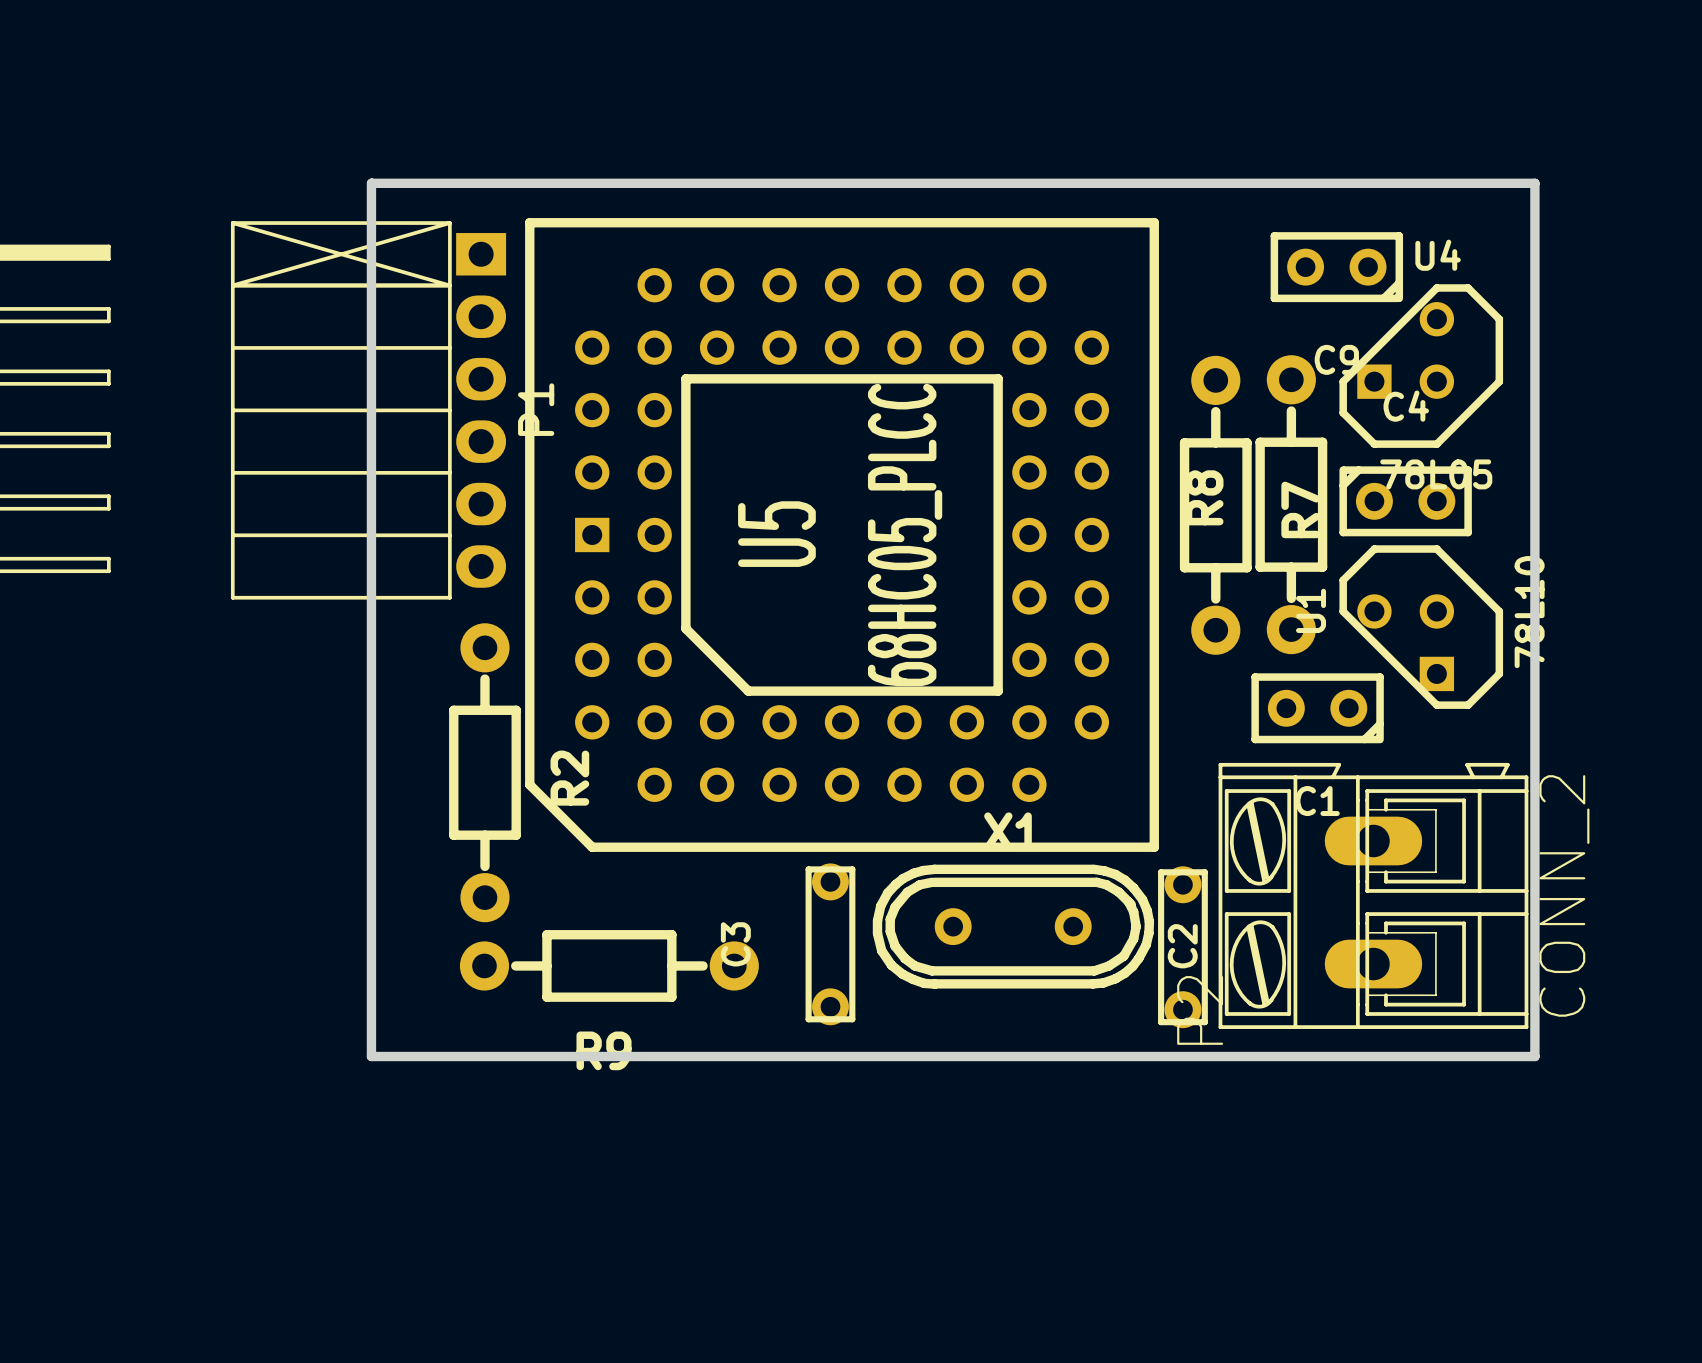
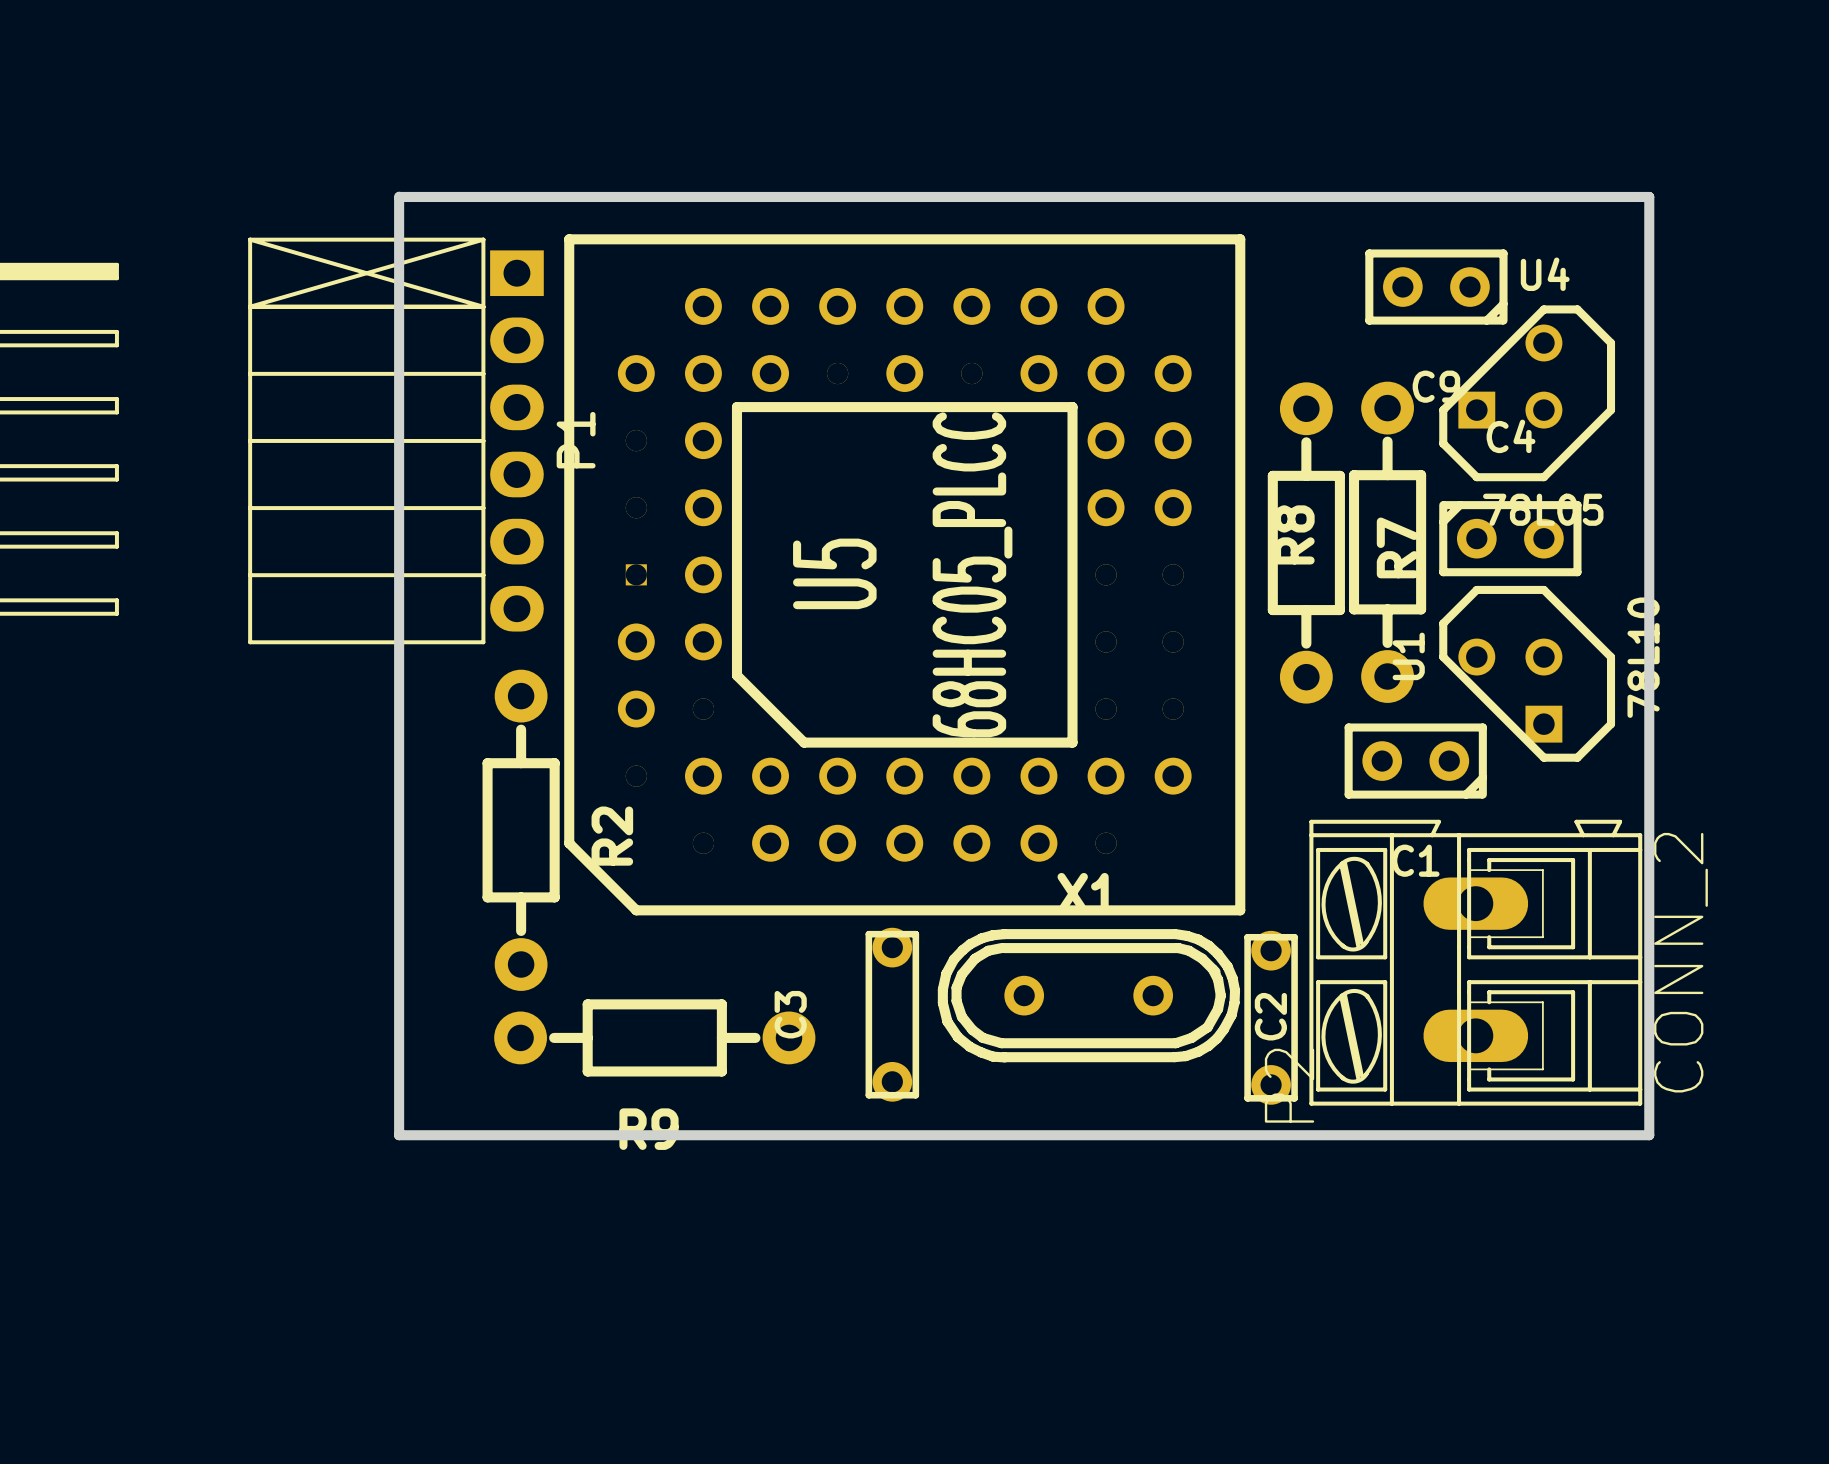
U5 footprint: [525, 218, 1159, 852] -> [564, 234, 1246, 916]

